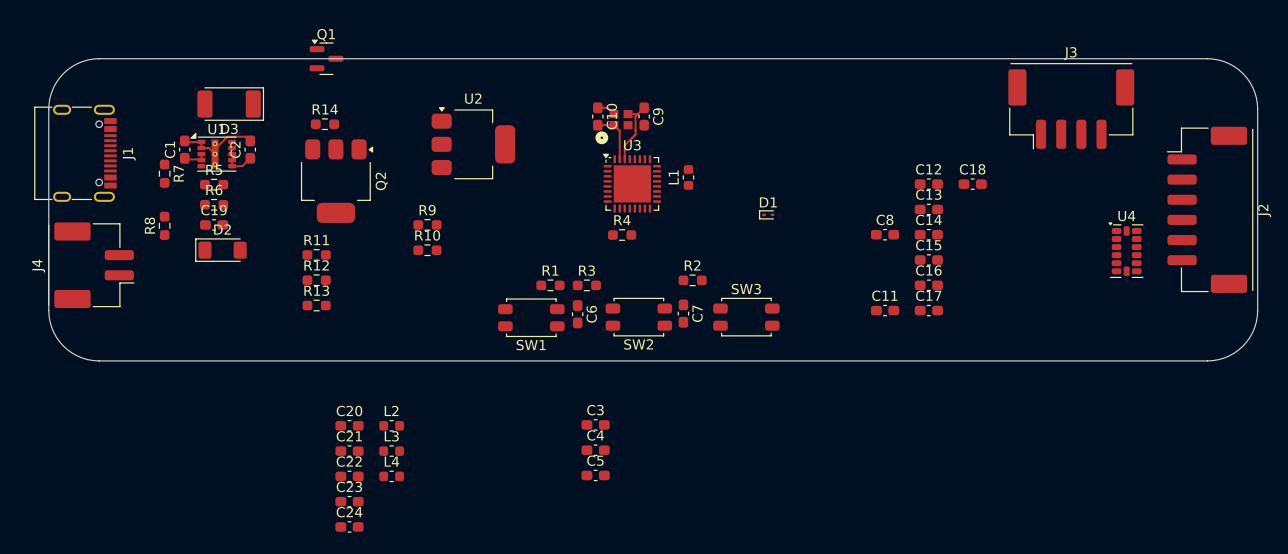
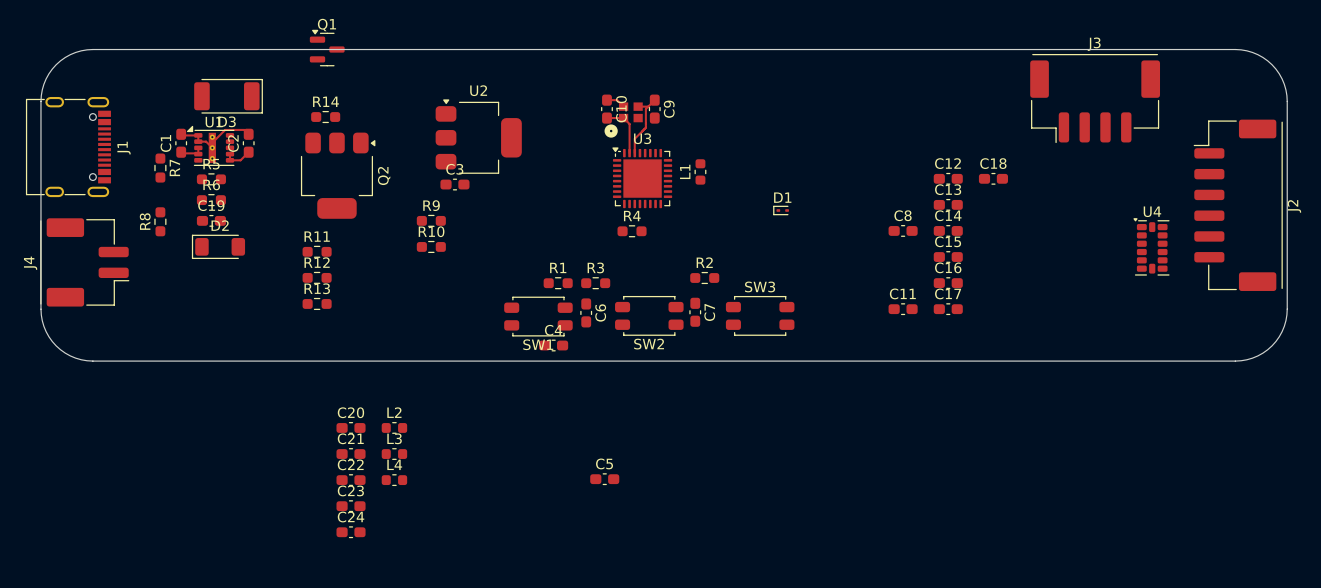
C3 position: (595, 424) -> (454, 184)
C4 position: (595, 450) -> (553, 345)

